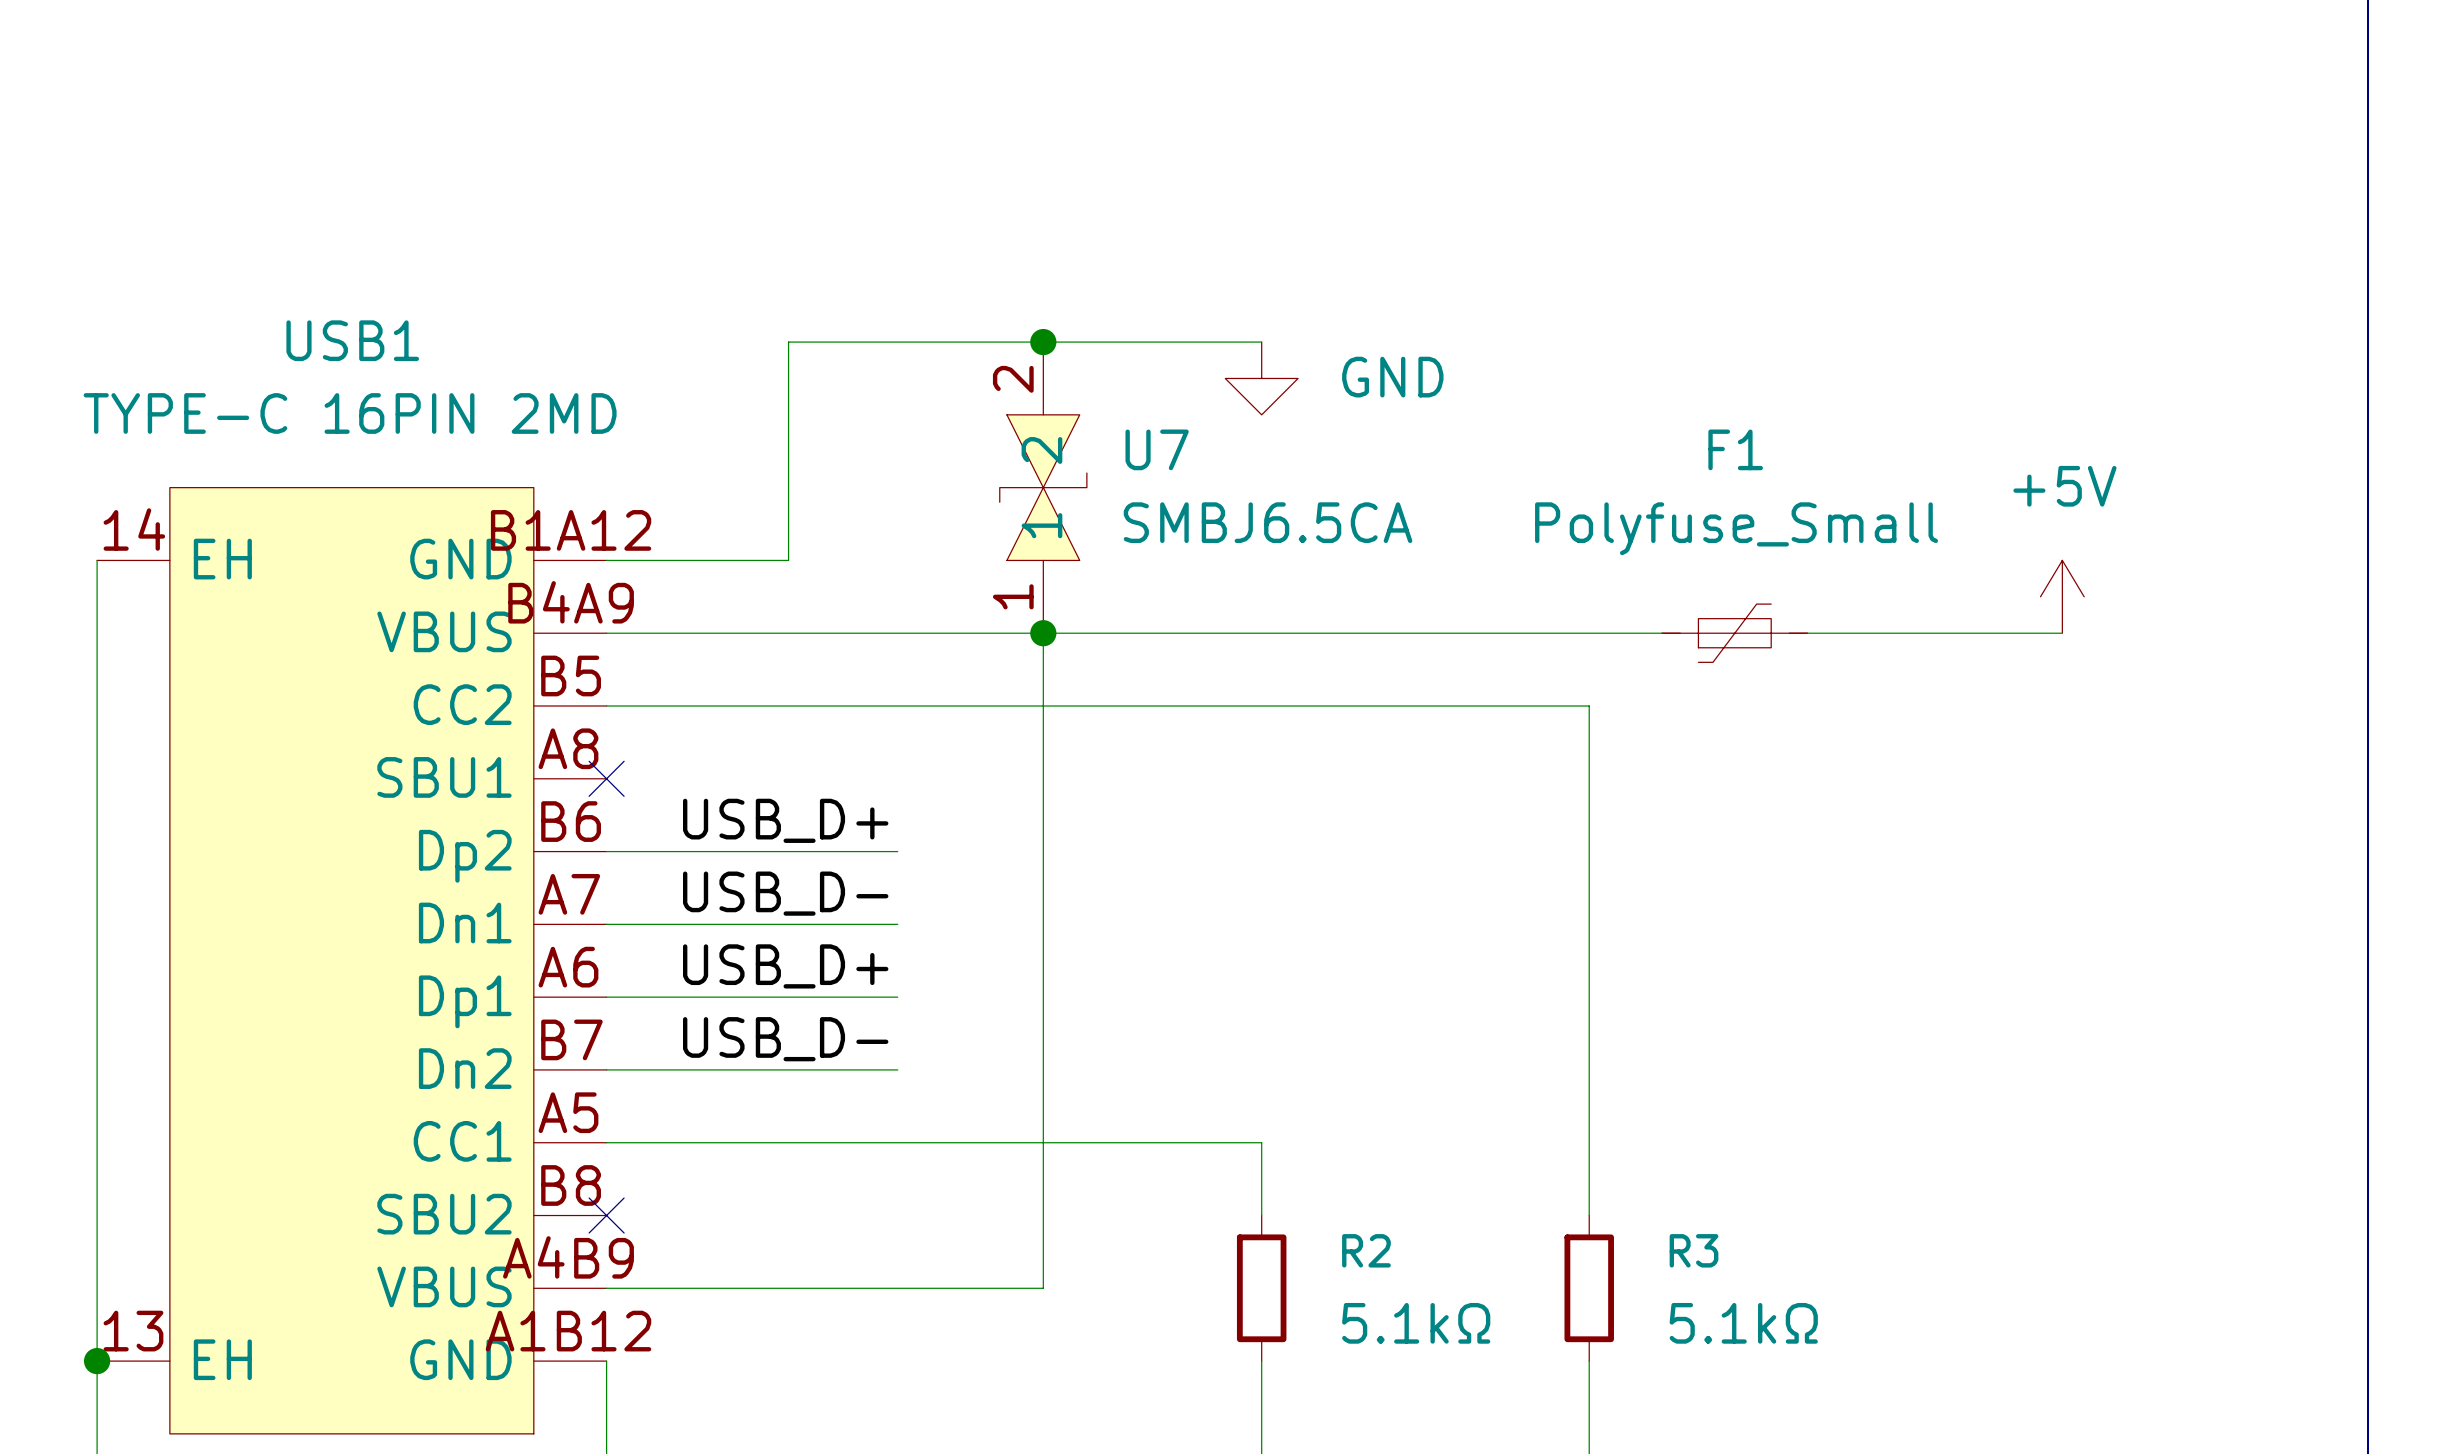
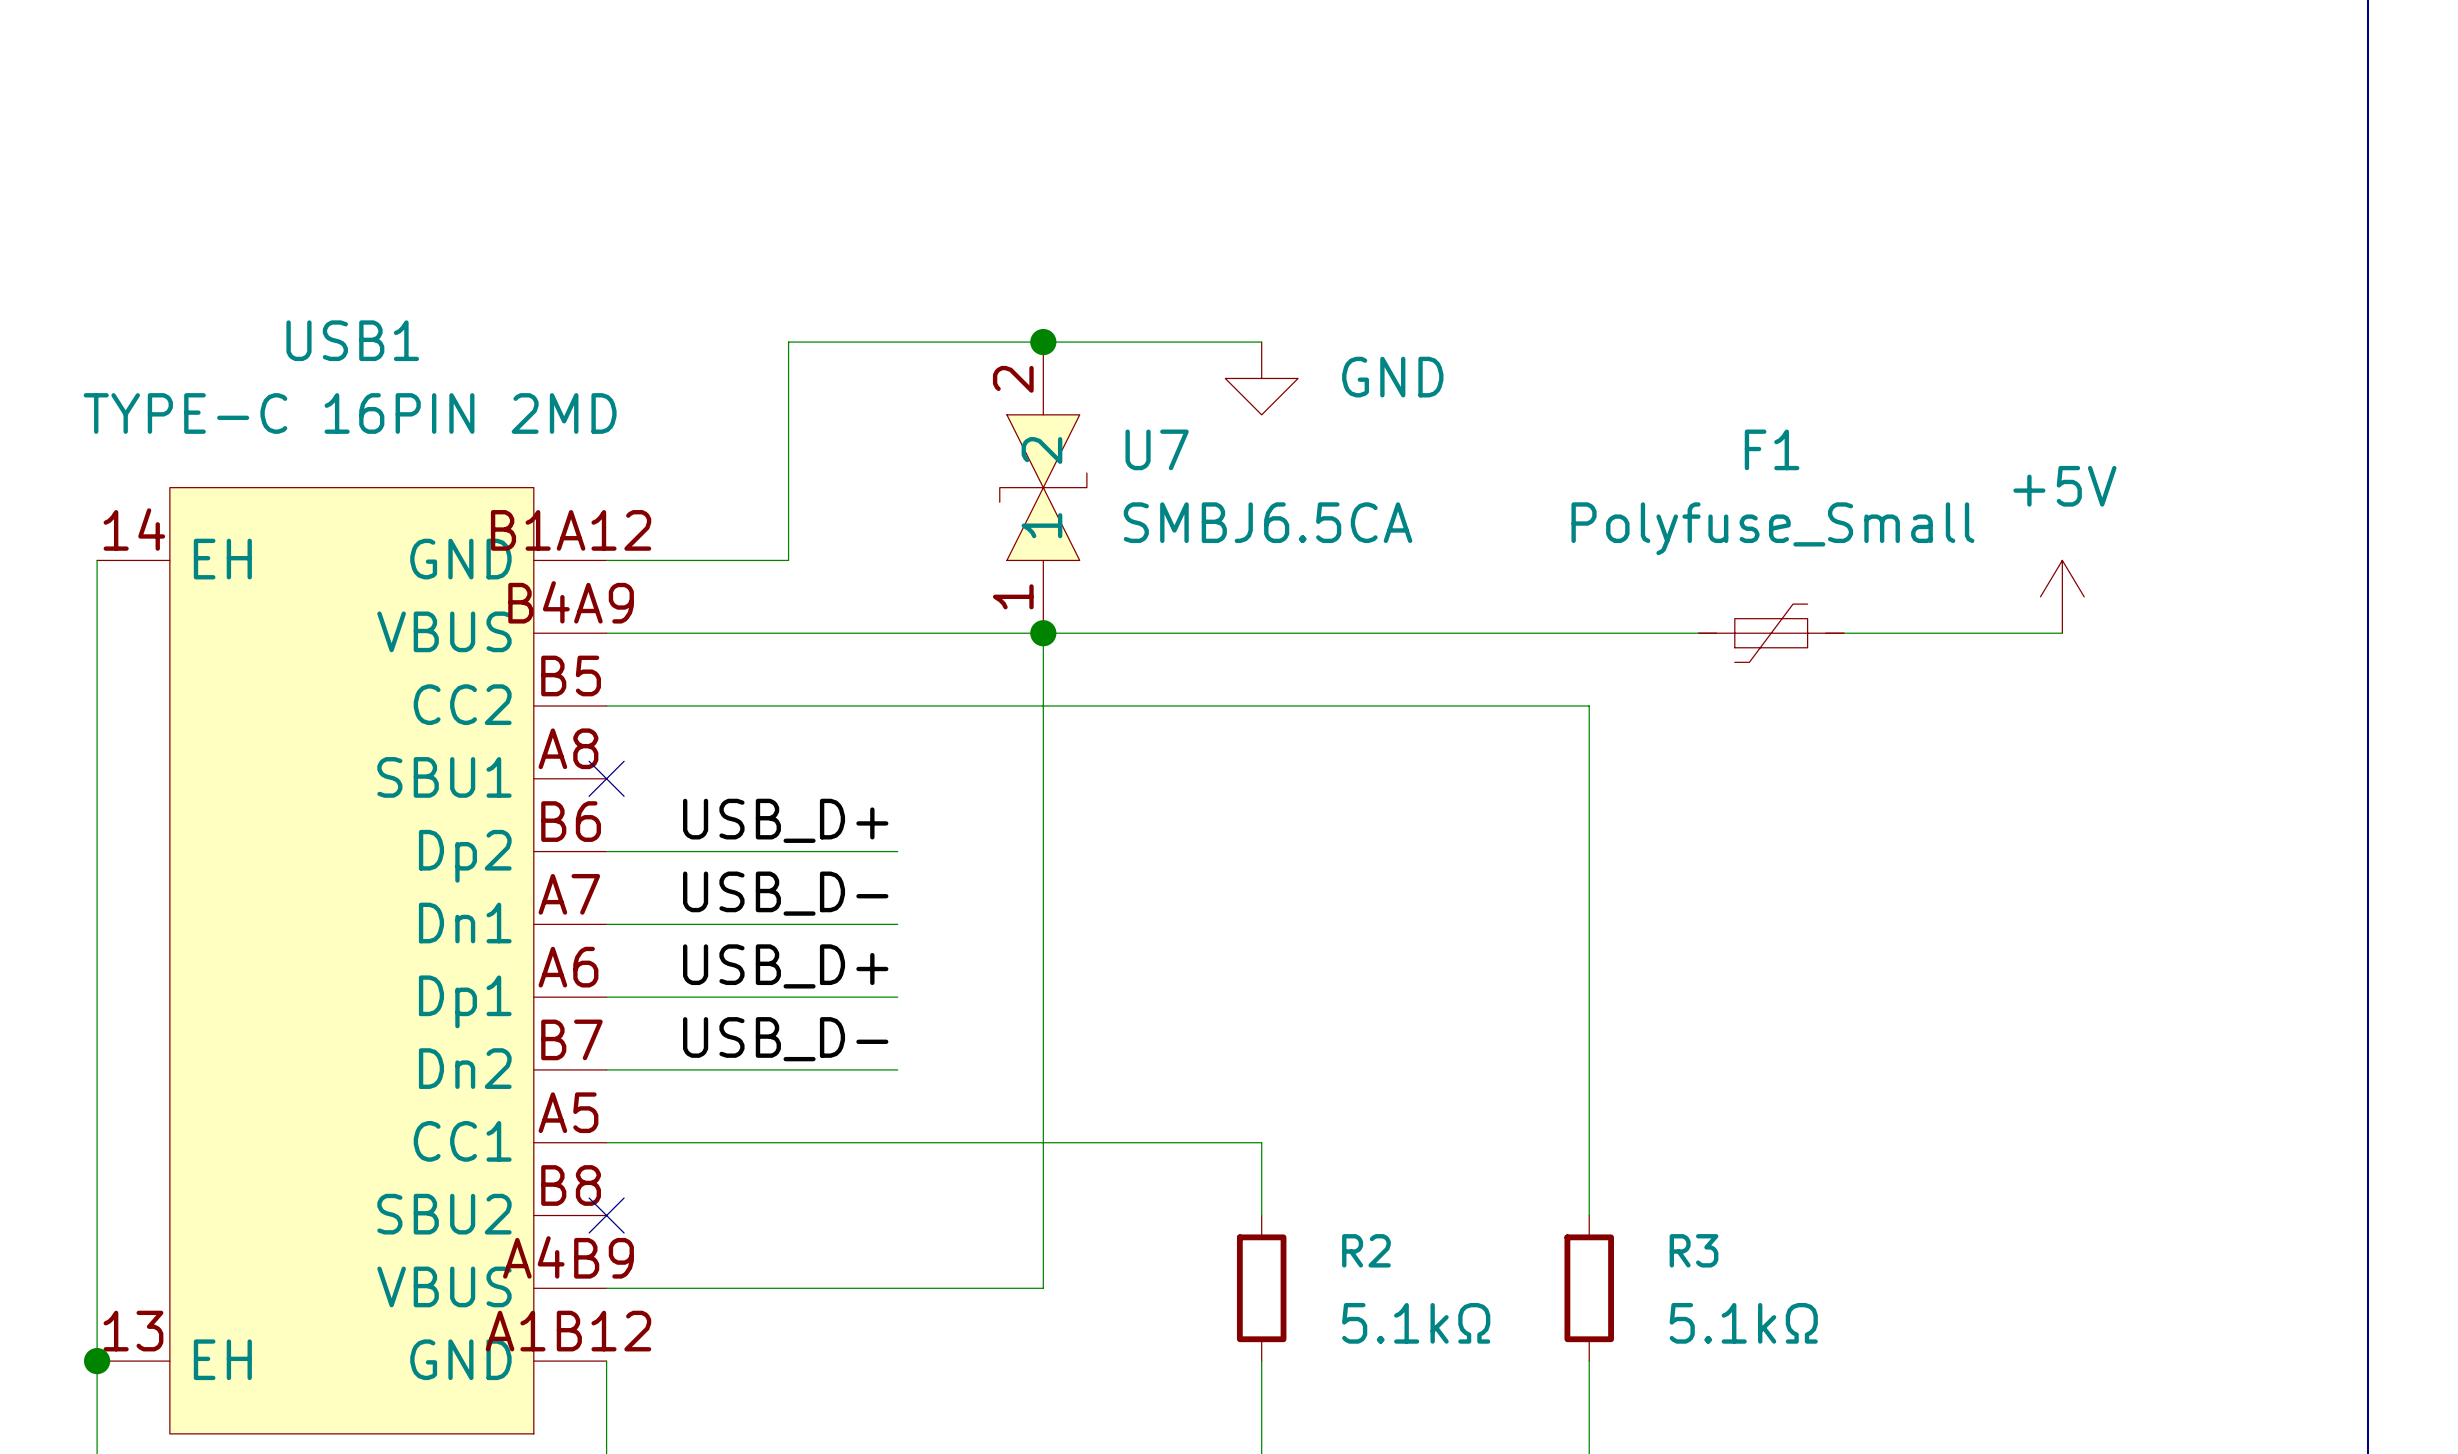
F1 position: (1734, 633) -> (1771, 633)

